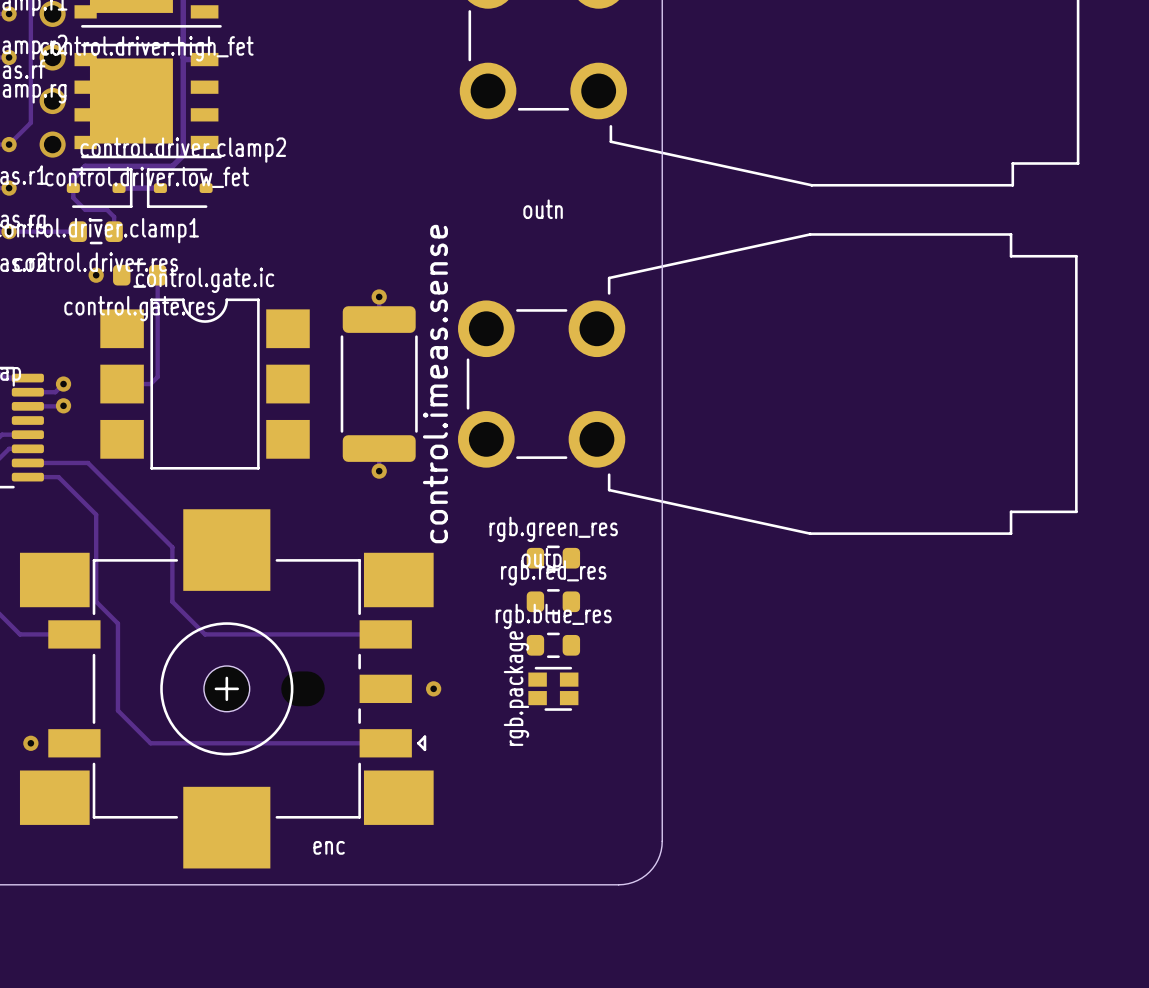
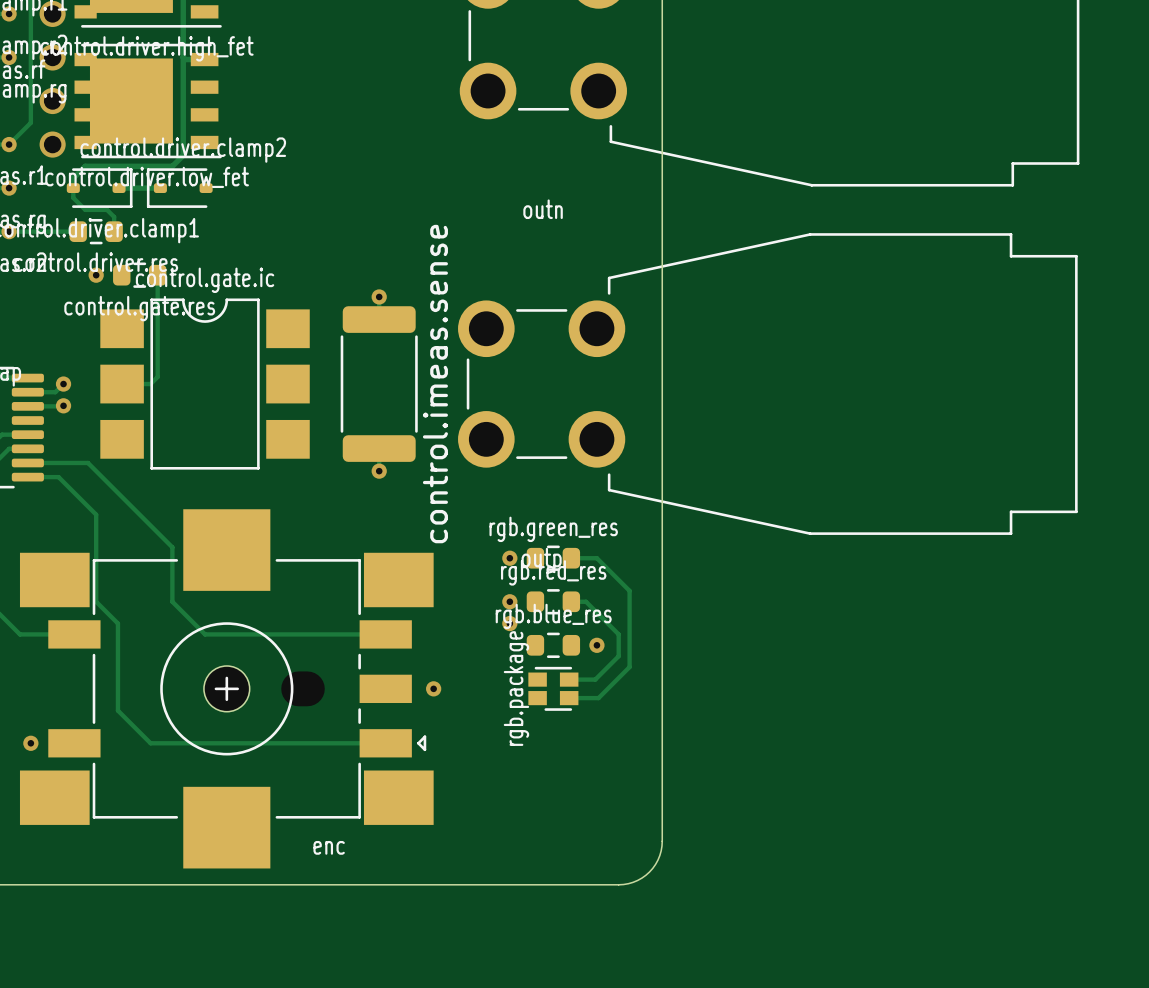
via: none -> (509, 558)
track: none -> (571, 558) (596, 558) (629, 590) (629, 667) (598, 698) (569, 698)
via: none -> (509, 601)
track: none -> (571, 601) (586, 601) (618, 634) (618, 656) (595, 679) (569, 679)
via: none -> (509, 623)
via: none -> (596, 645)

